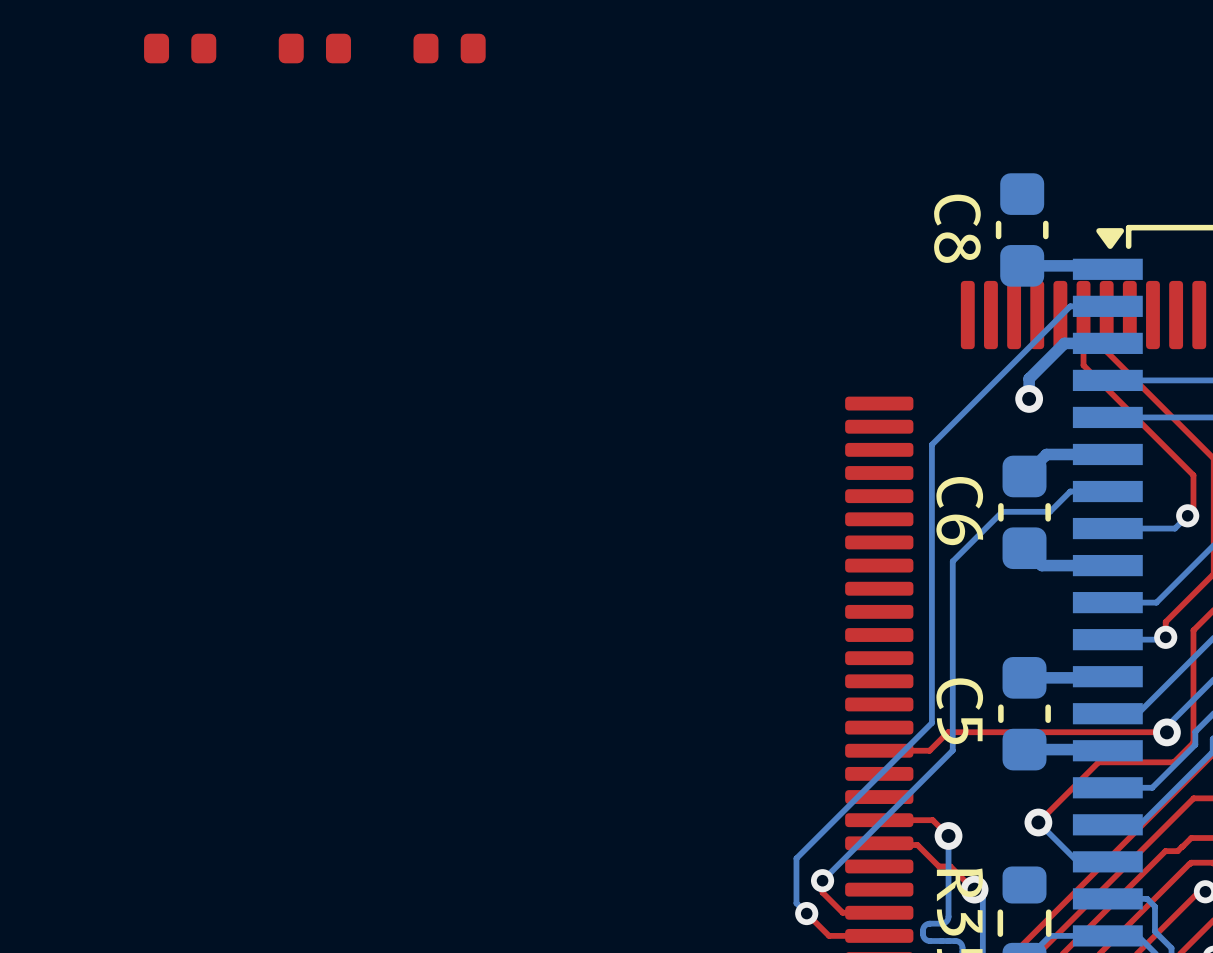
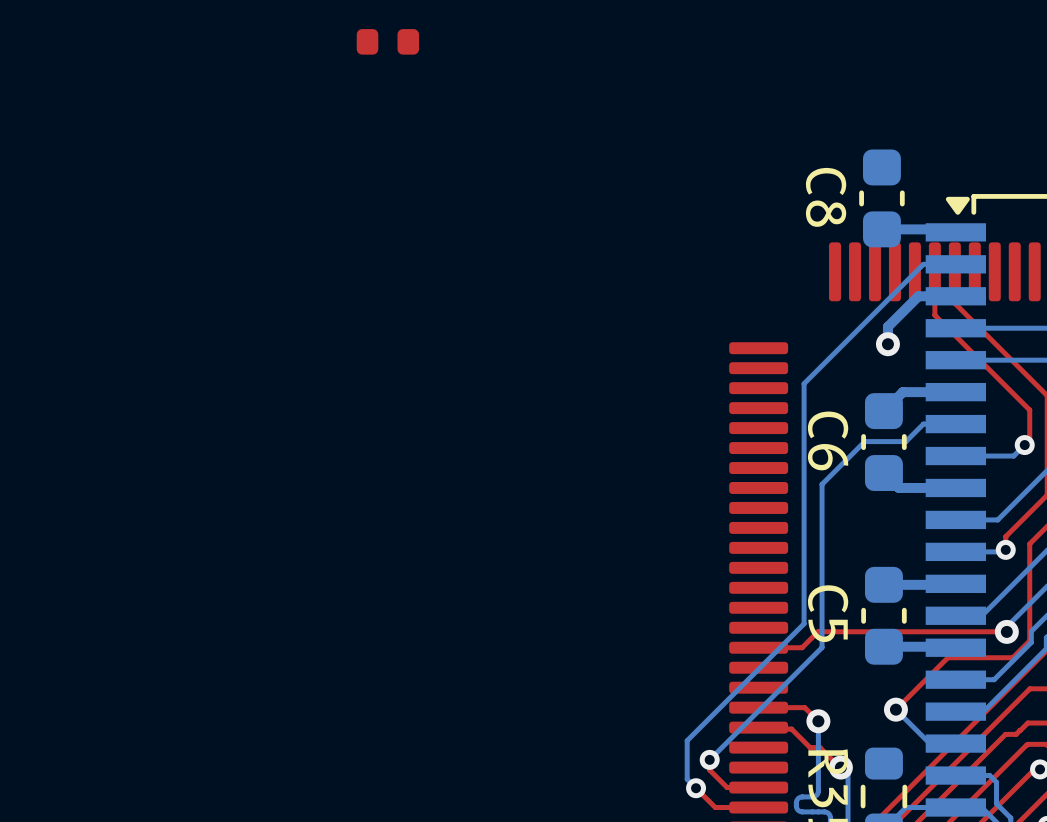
part: (180, 48) -> none
part: (314, 48) -> none

